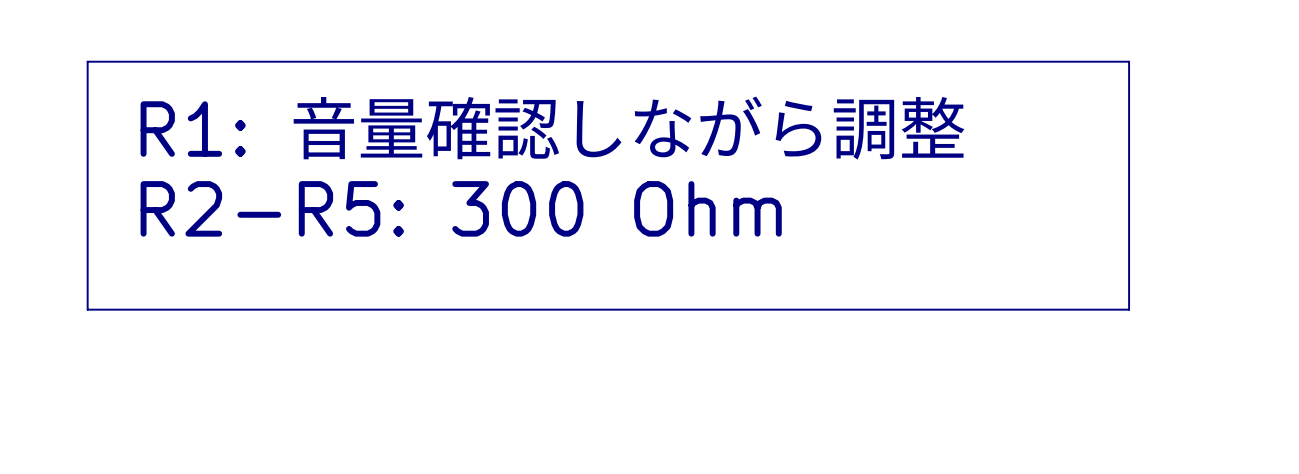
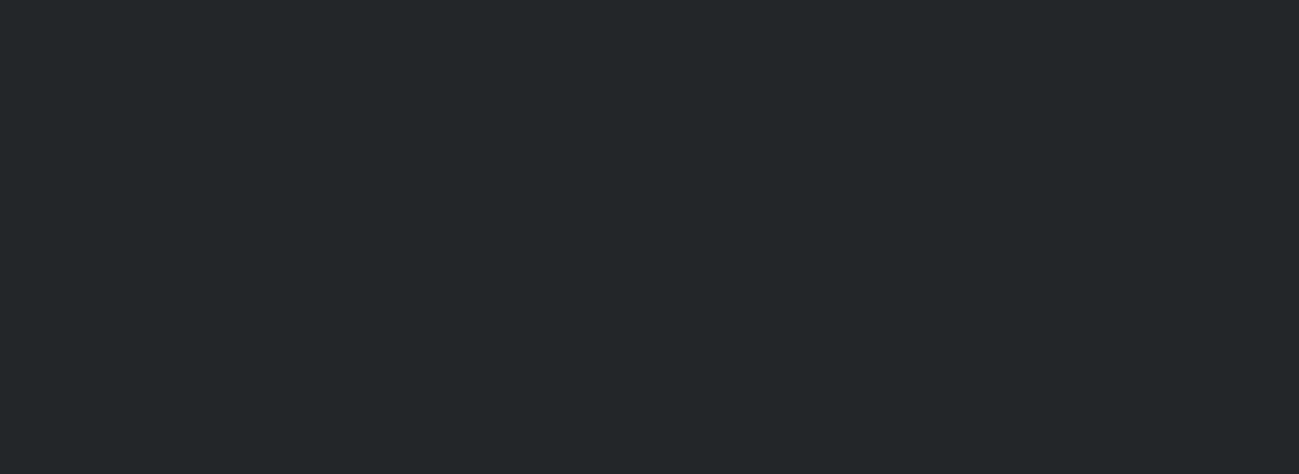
line: (87, 61) (1129, 61) (1129, 309) (87, 309) (87, 61) -> none
text: R1: 音量確認しながら調整 (554, 128) -> none
text: R2-R5: 300 Ohm (461, 208) -> none

